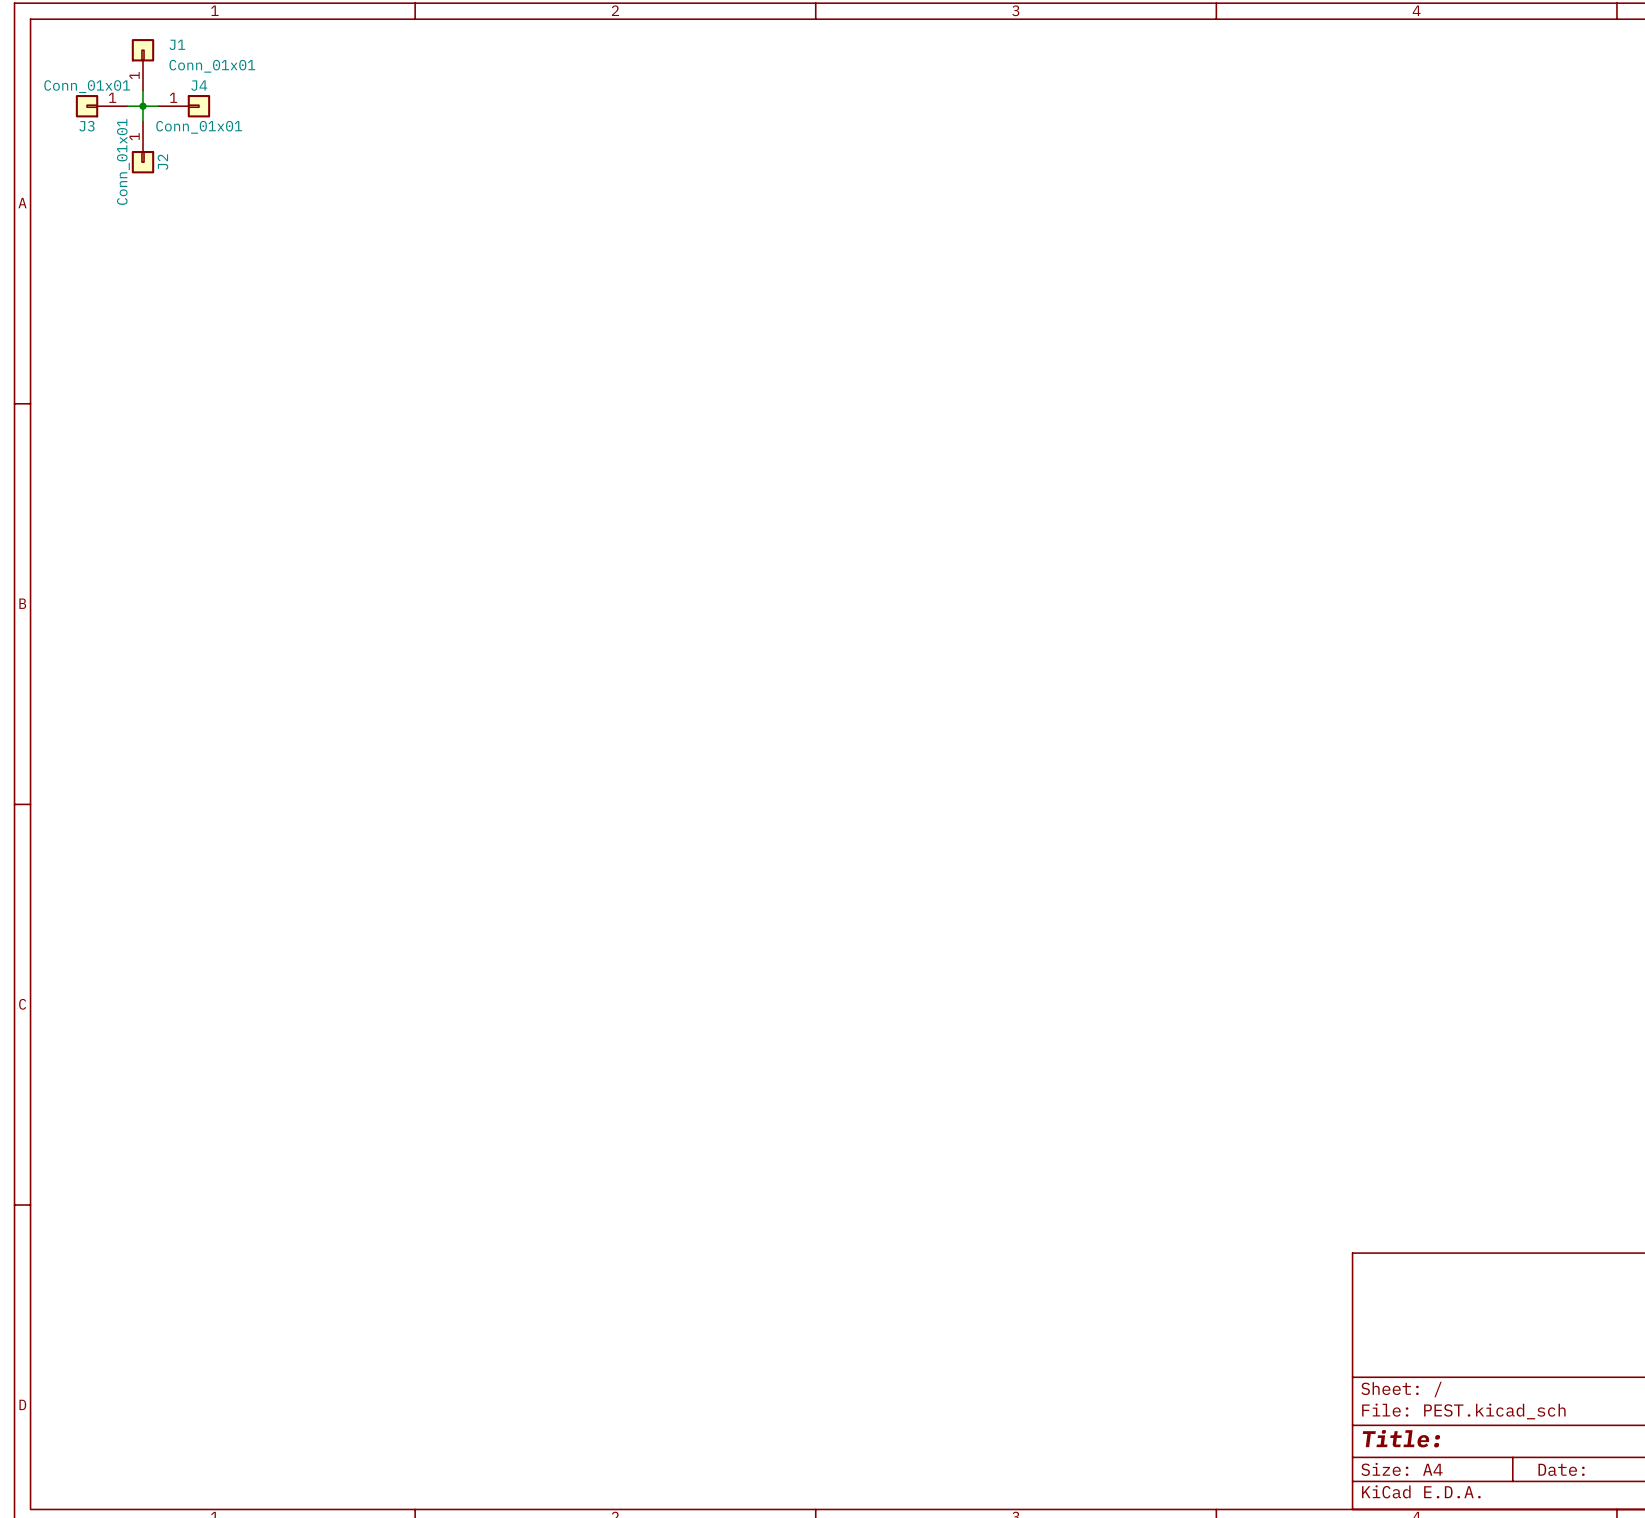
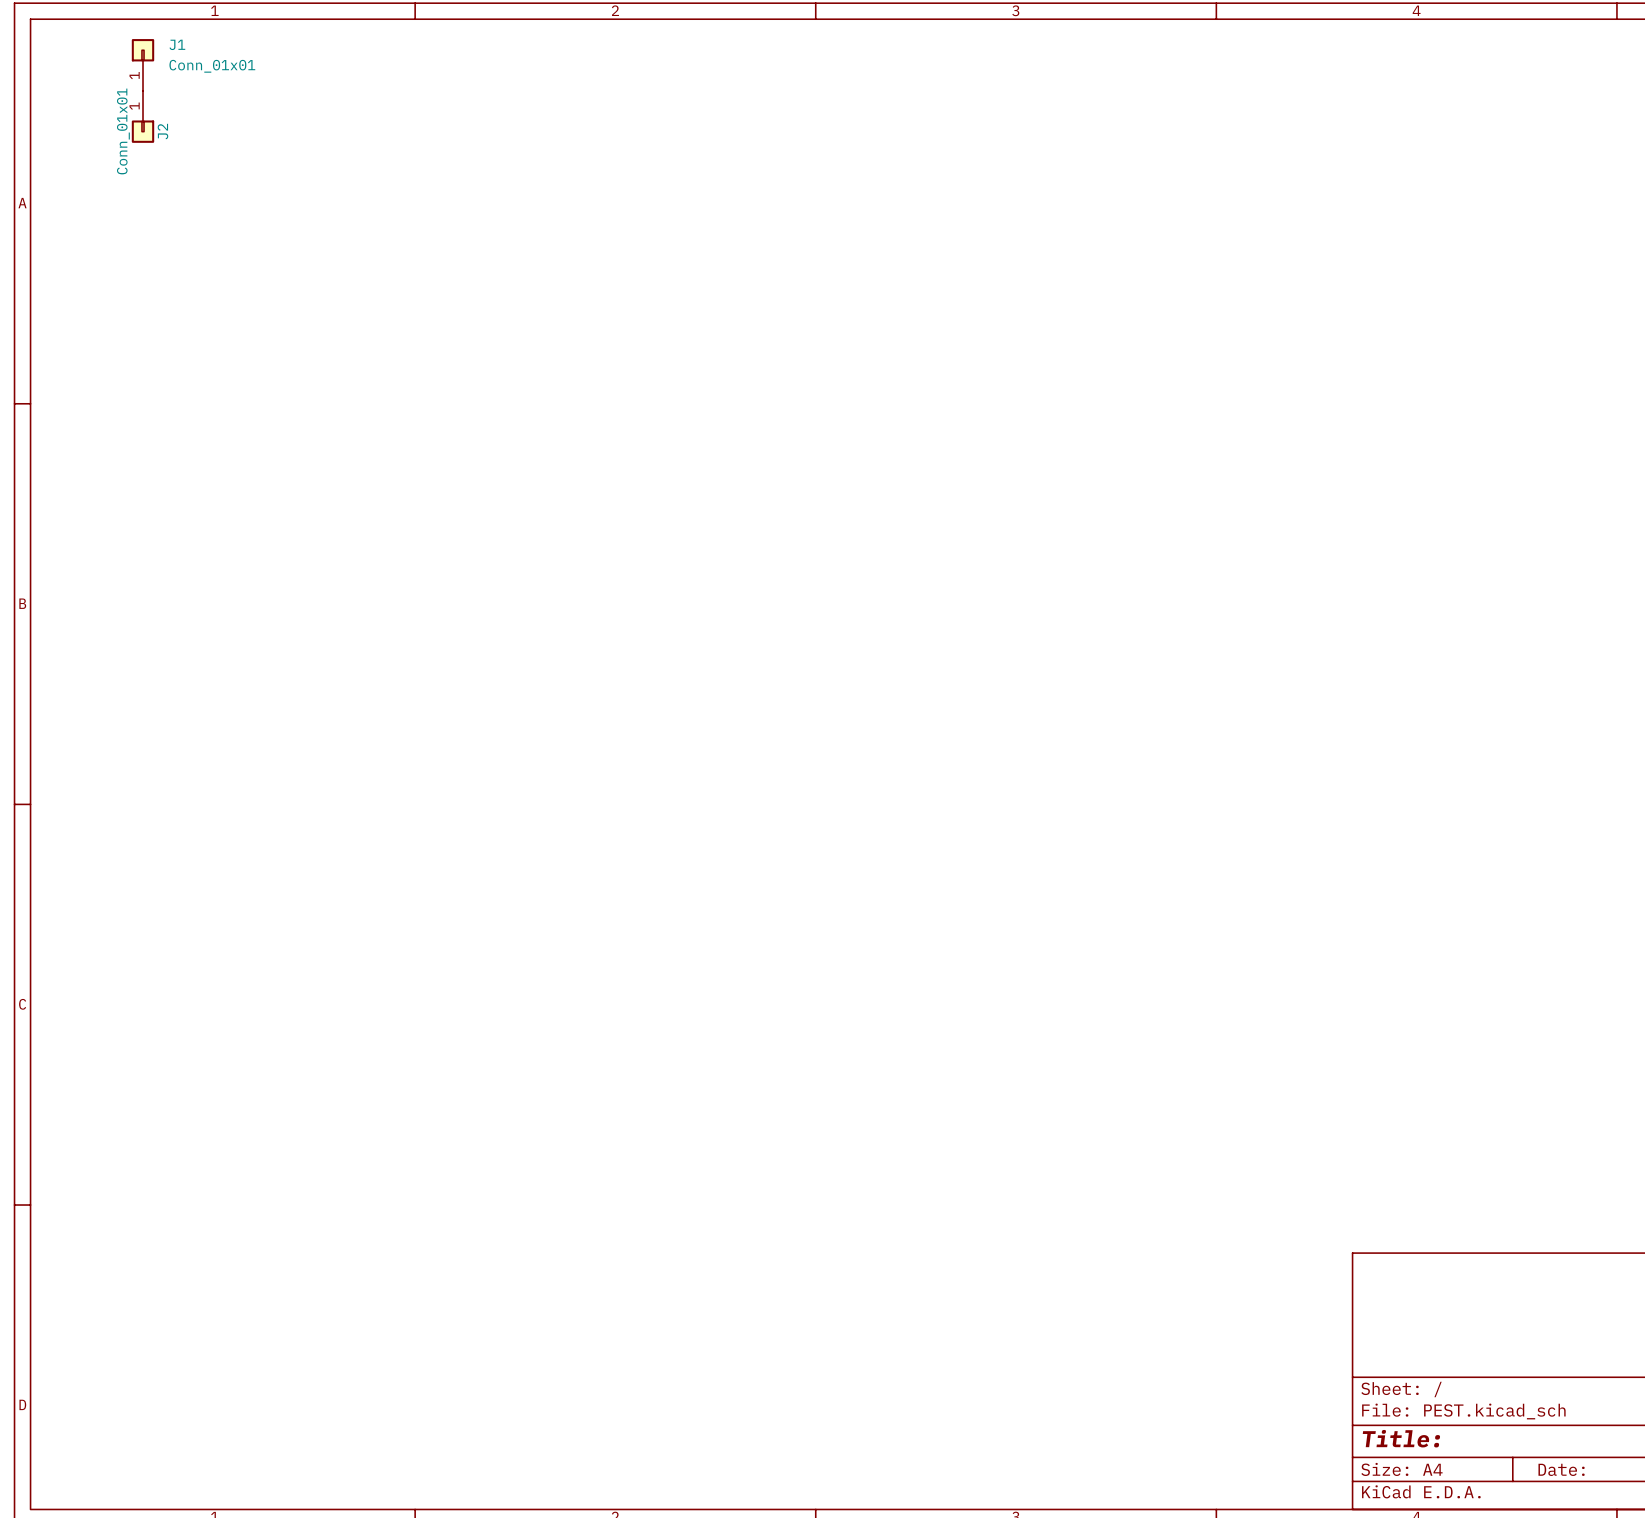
J3: Conn_01x01 (101, 106) -> none
wire: (127, 106) (158, 106) -> none
junction: (143, 106) -> none
J4: Conn_01x01 (184, 106) -> none
J2 position: (143, 147) -> (143, 116)

